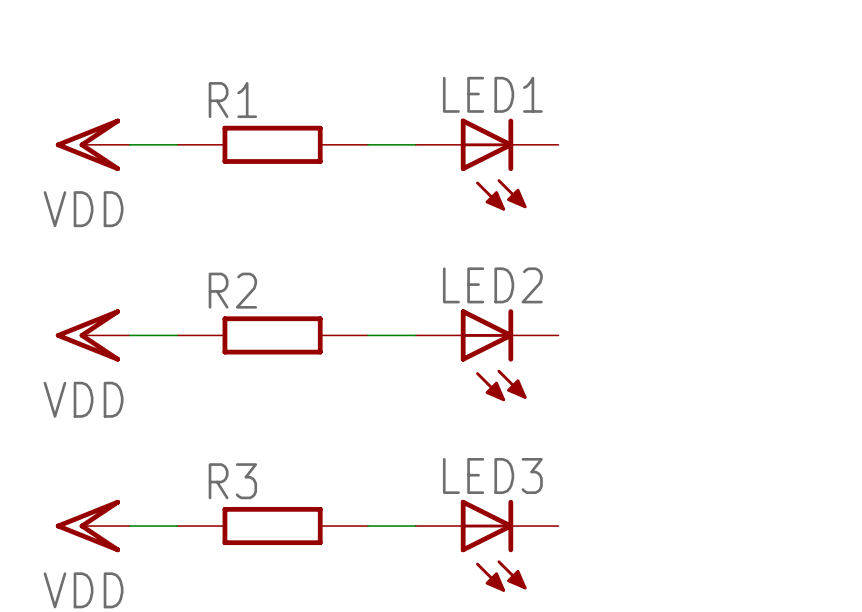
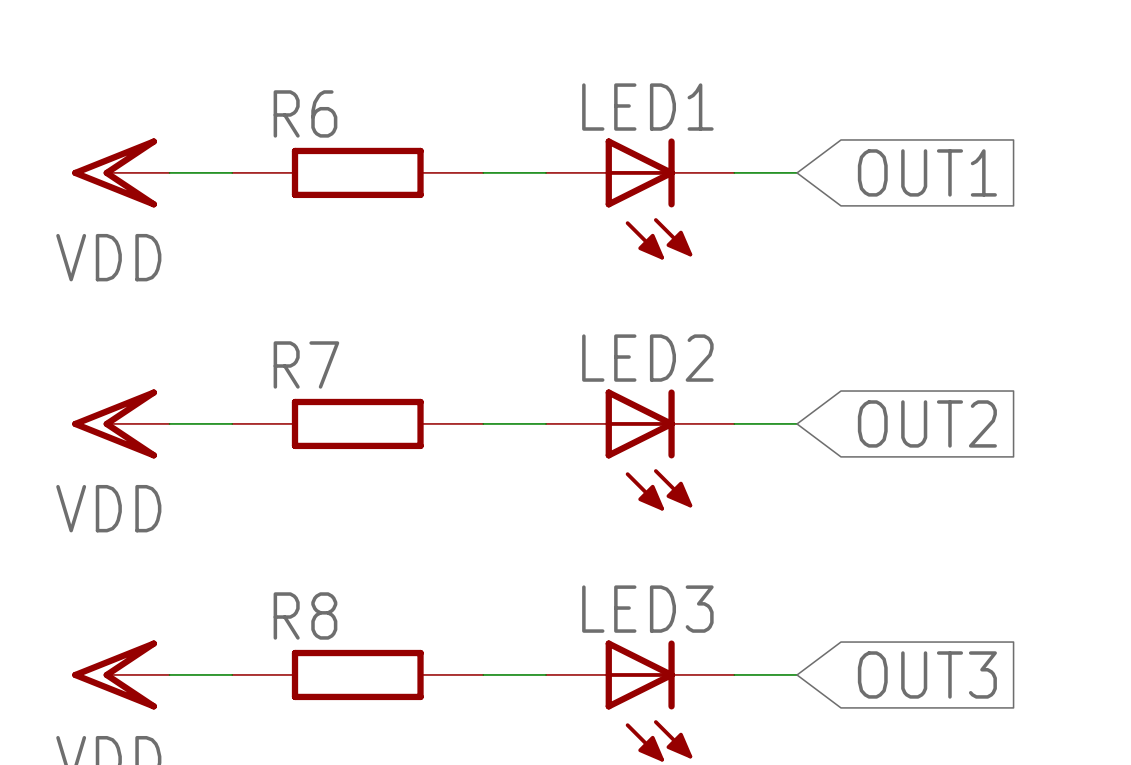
R1 name: R1 (232, 100) -> R6 (305, 113)
wire: none -> (734, 172) (797, 172)
global label: none -> OUT1 (927, 172)
R2 name: R2 (232, 290) -> R7 (306, 364)
wire: none -> (734, 423) (797, 423)
global label: none -> OUT2 (927, 423)
R3 name: R3 (232, 481) -> R8 (305, 615)
wire: none -> (734, 674) (797, 674)
global label: none -> OUT3 (927, 674)

